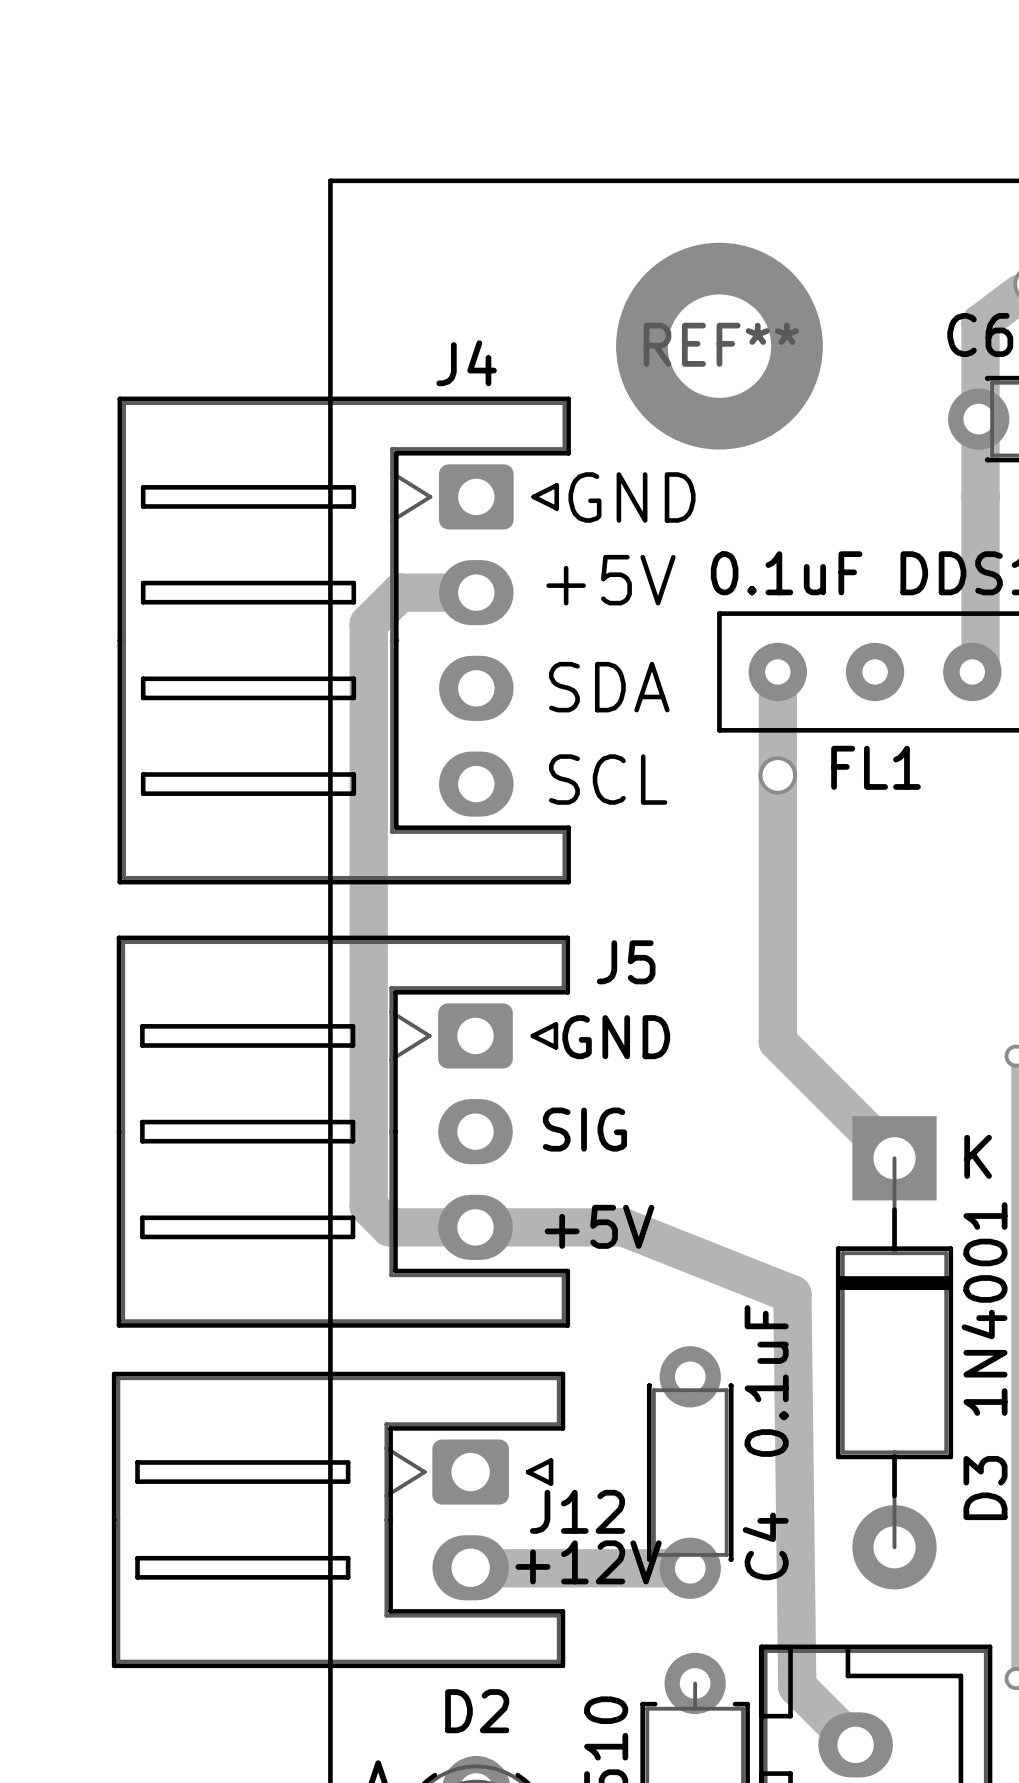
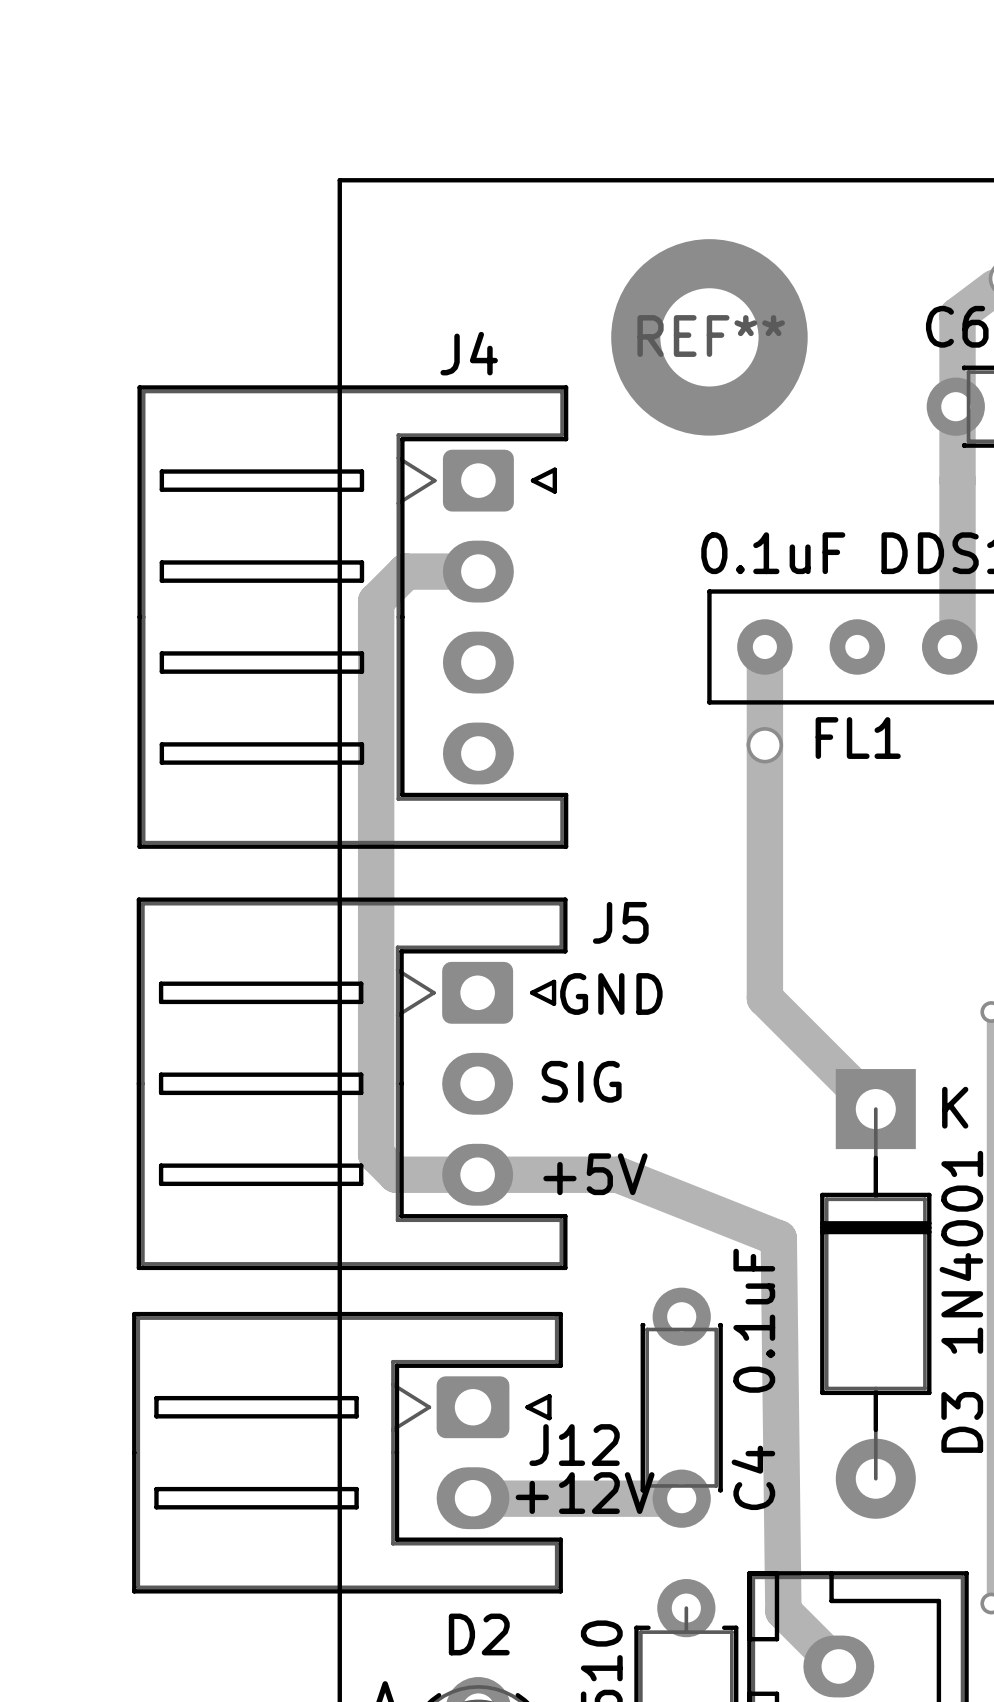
text: GND (632, 497) -> none
text: +5V (610, 580) -> none
text: SDA (609, 687) -> none
text: SCL (608, 779) -> none

